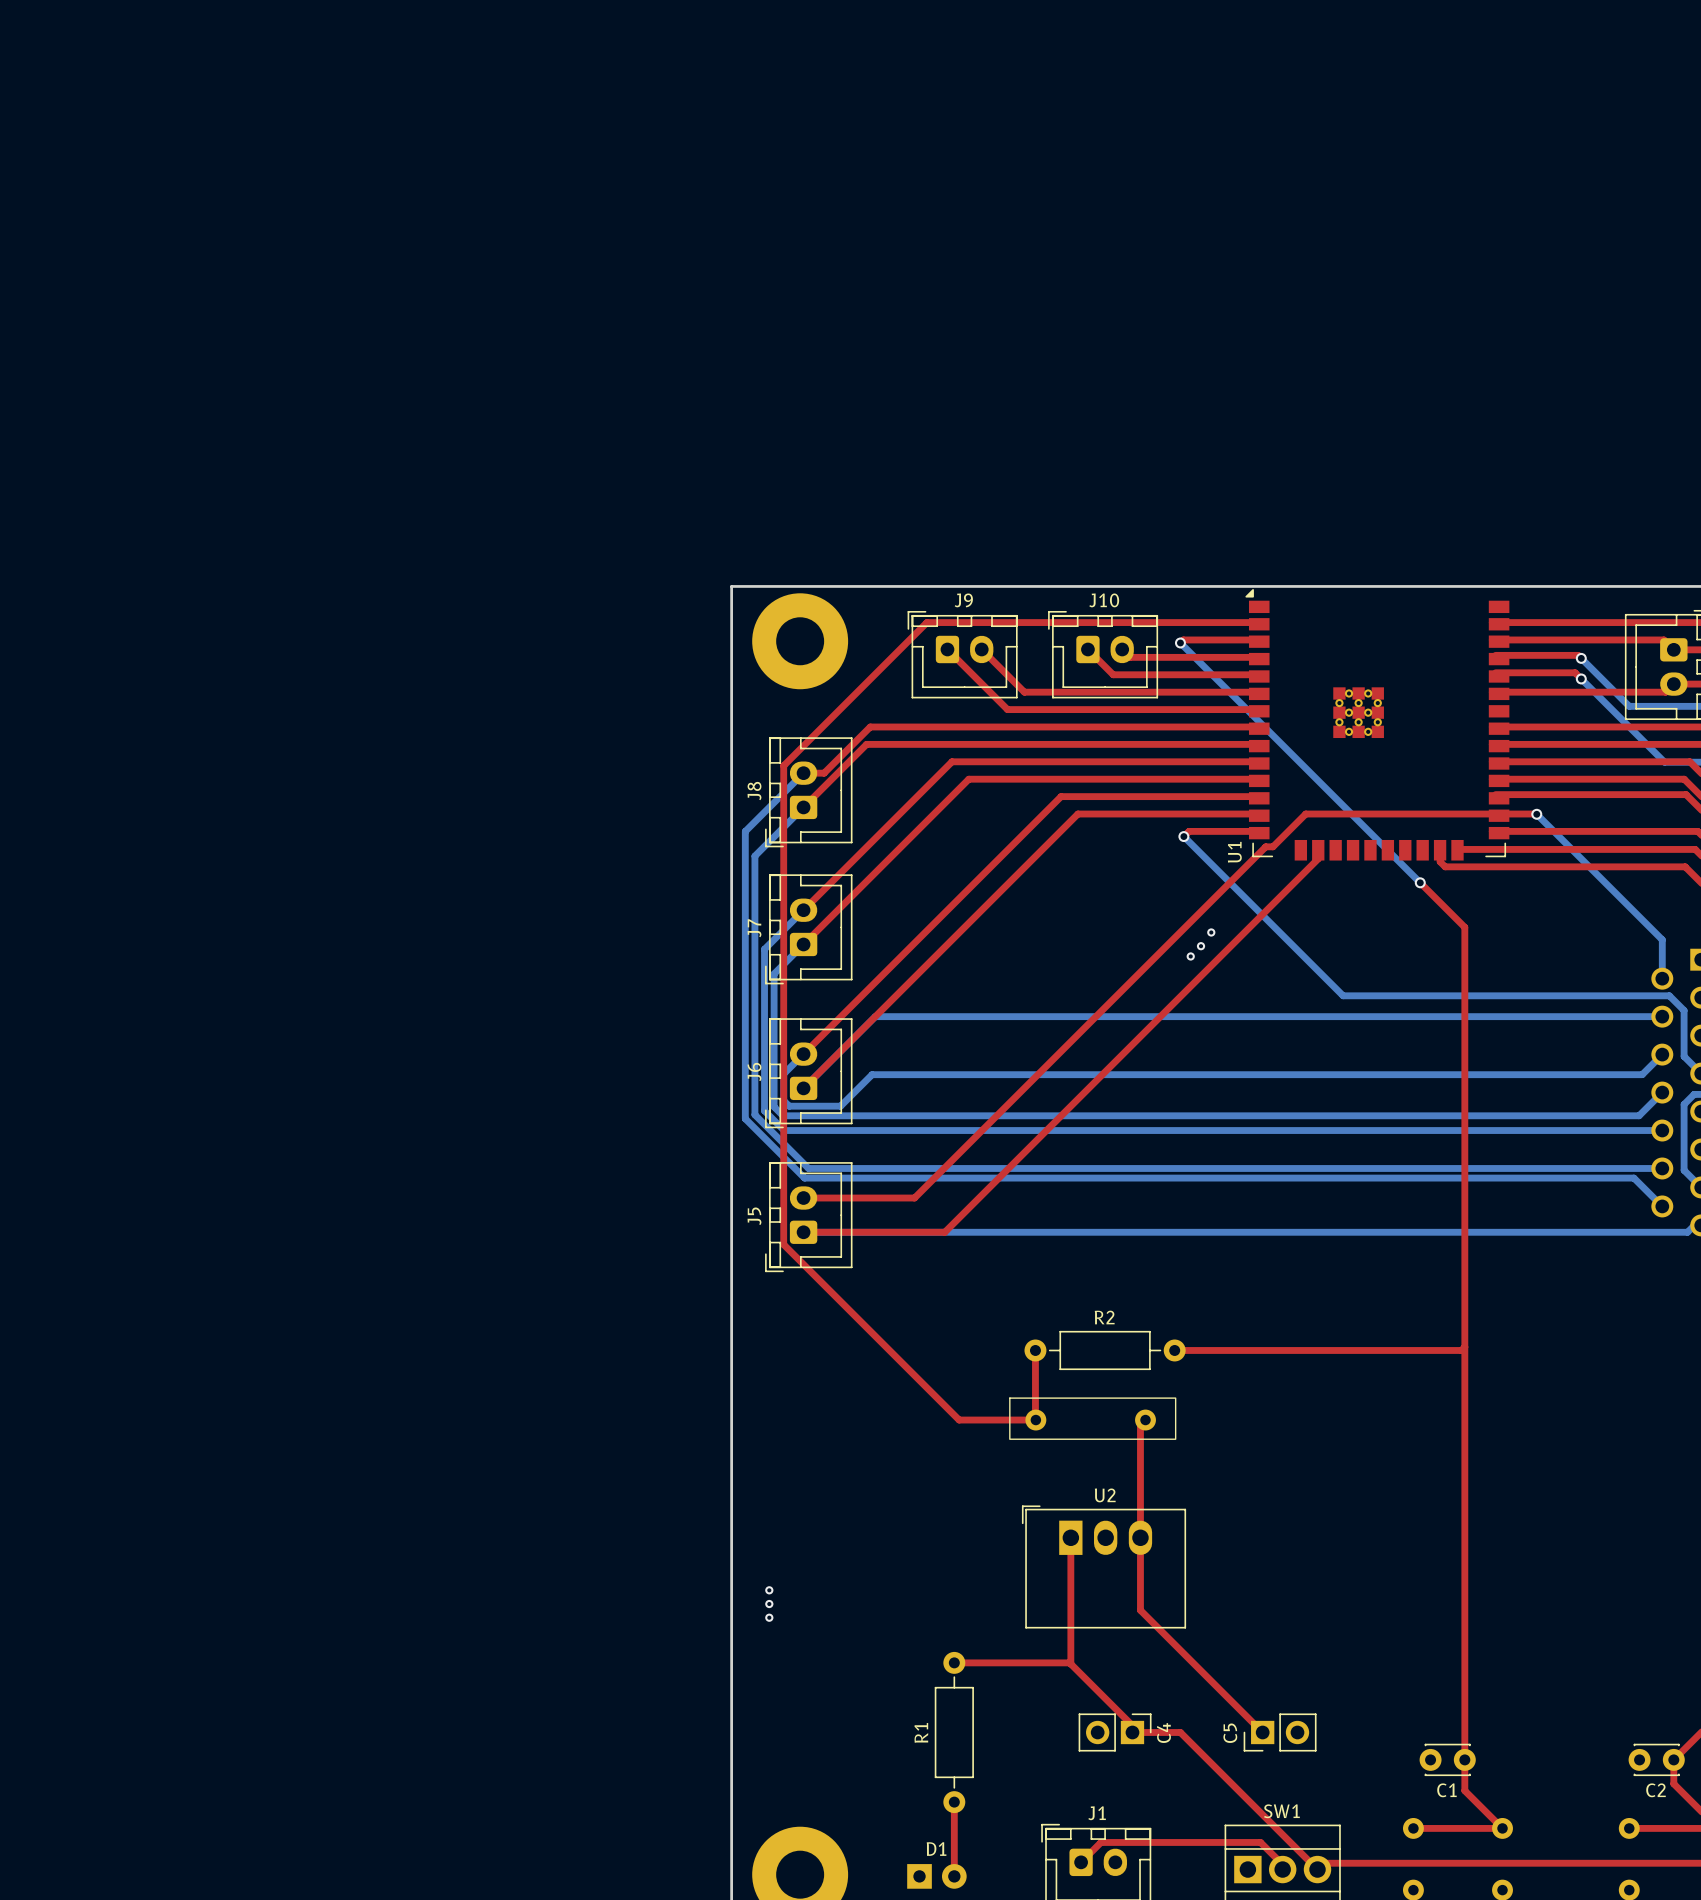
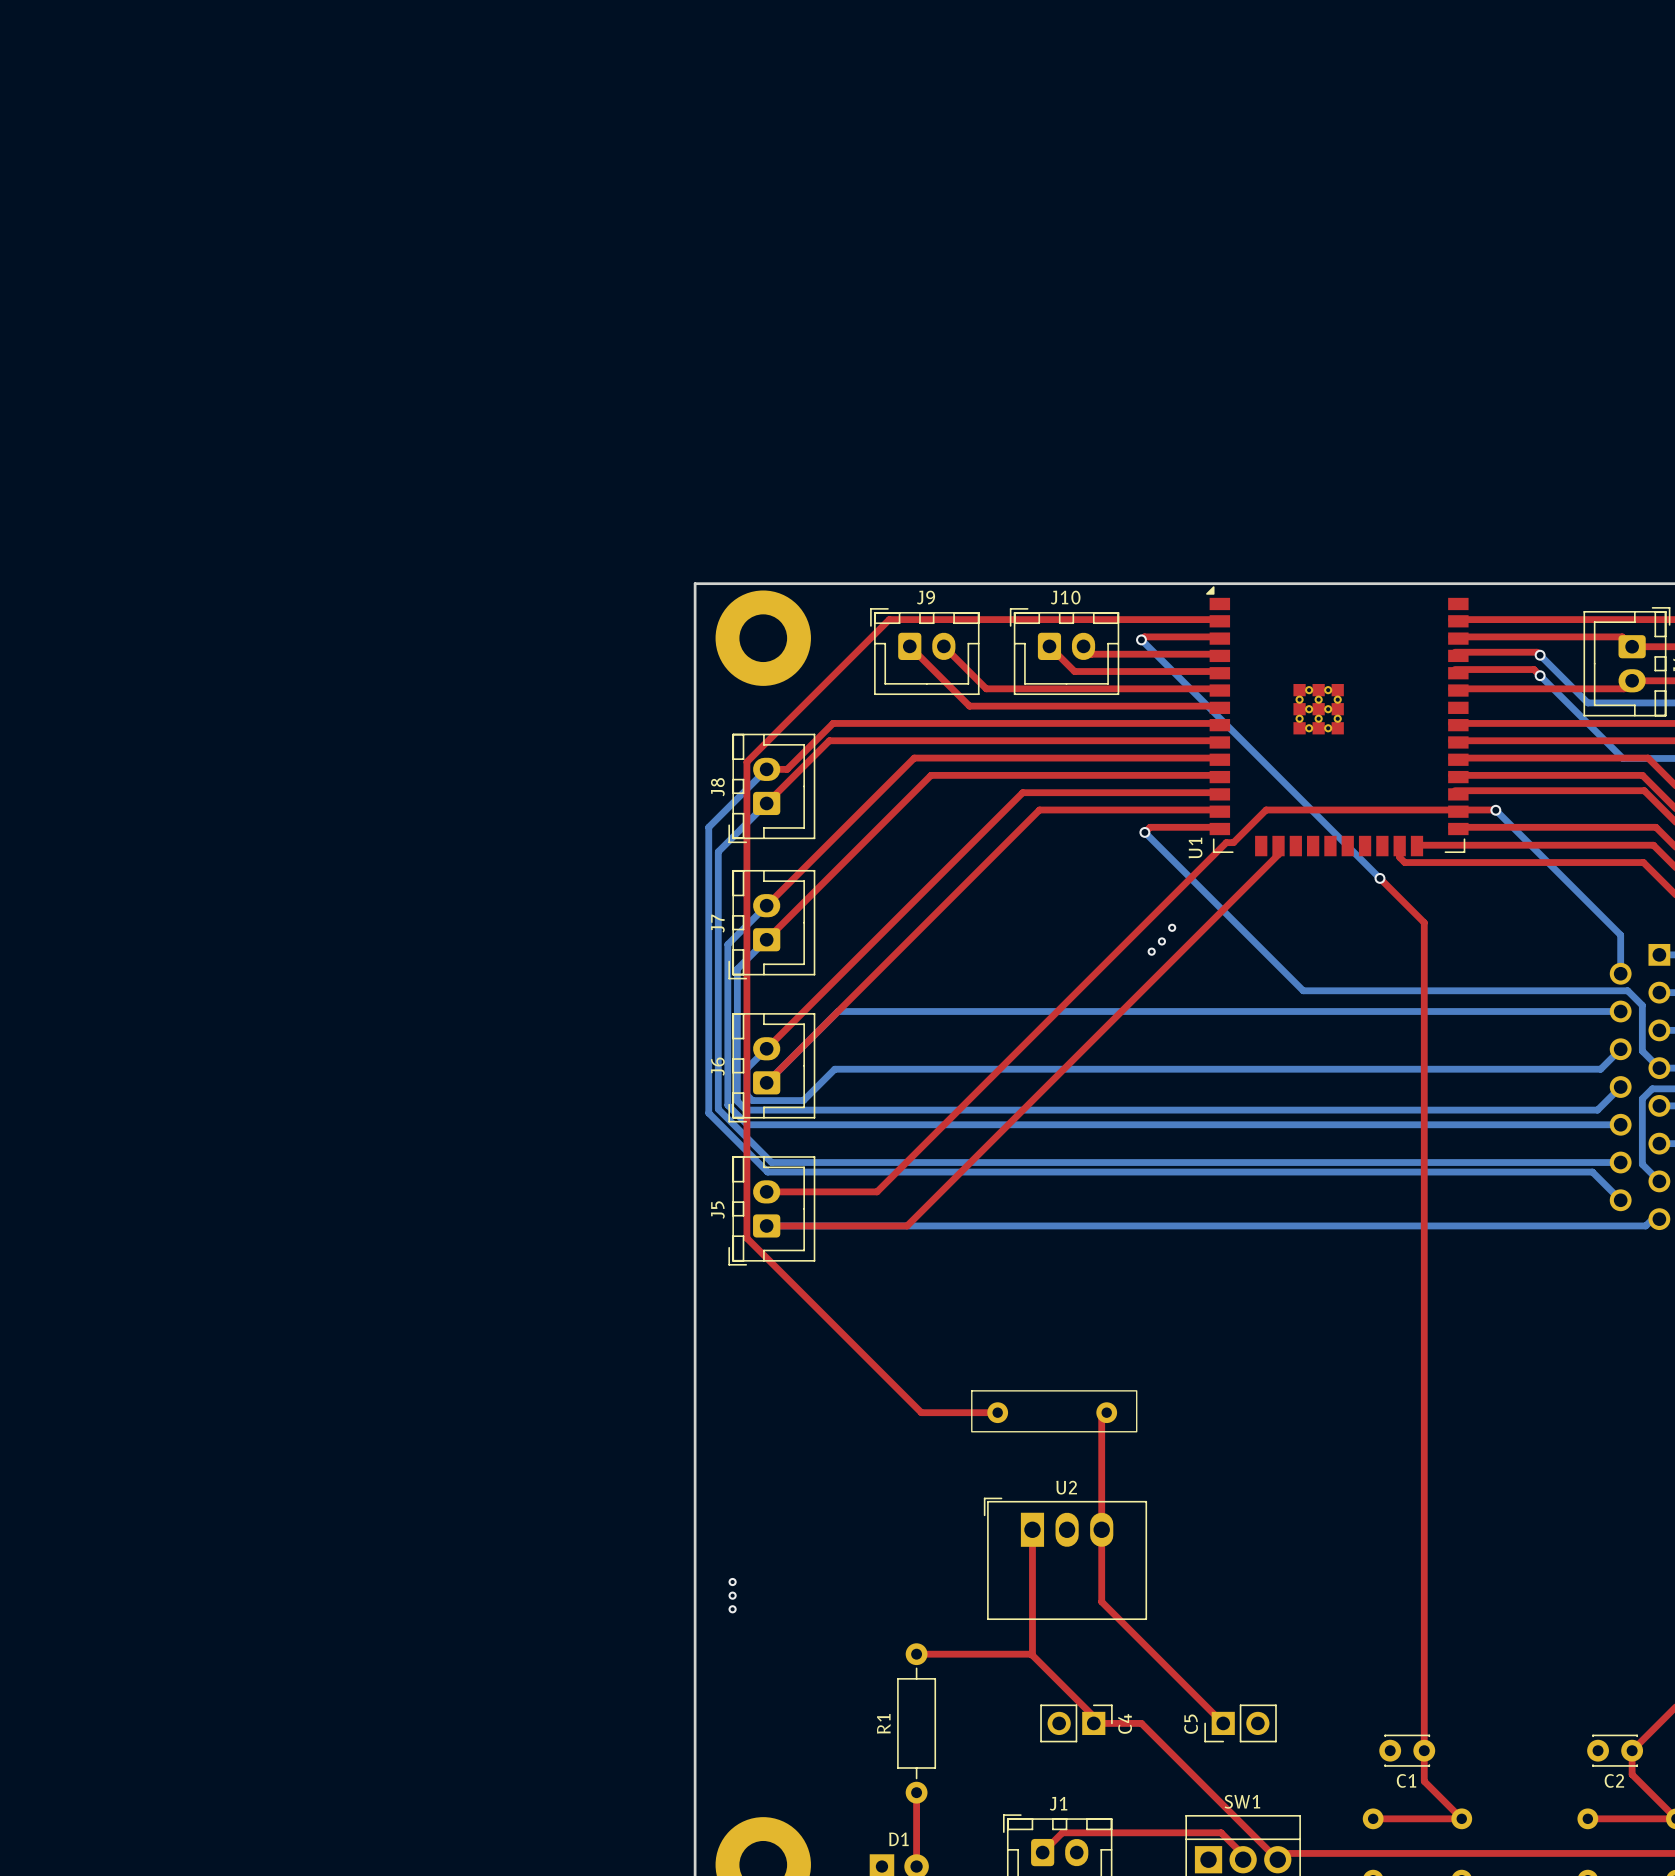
top track: (1464, 1347) (1461, 1350) (1174, 1350) -> none
top track: (1035, 1350) (1035, 1420) -> none
R2: (1105, 1350) -> none

